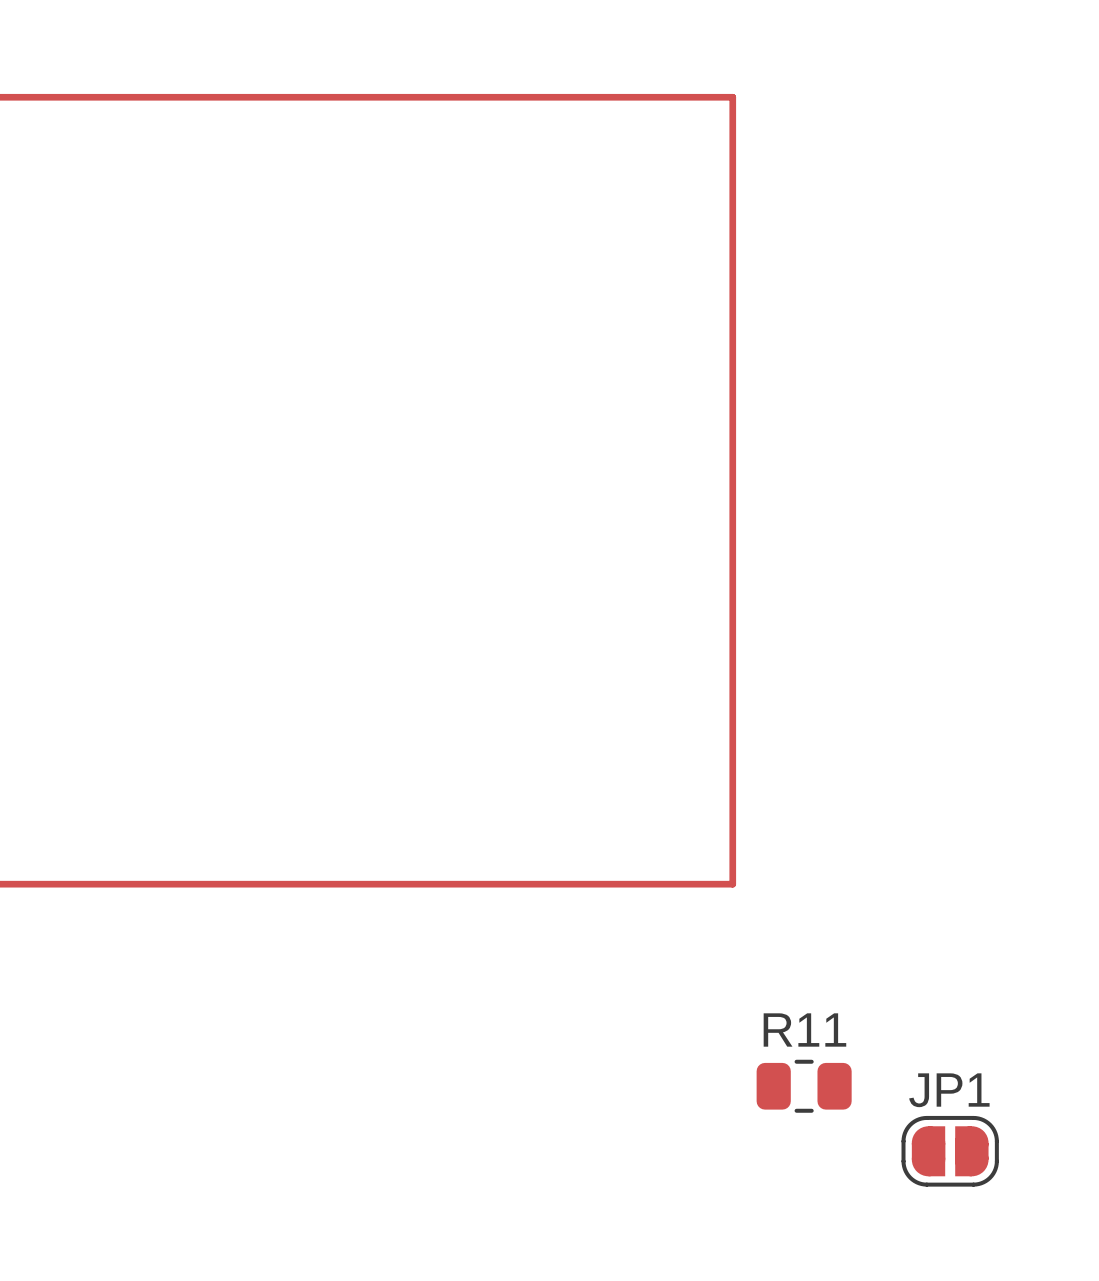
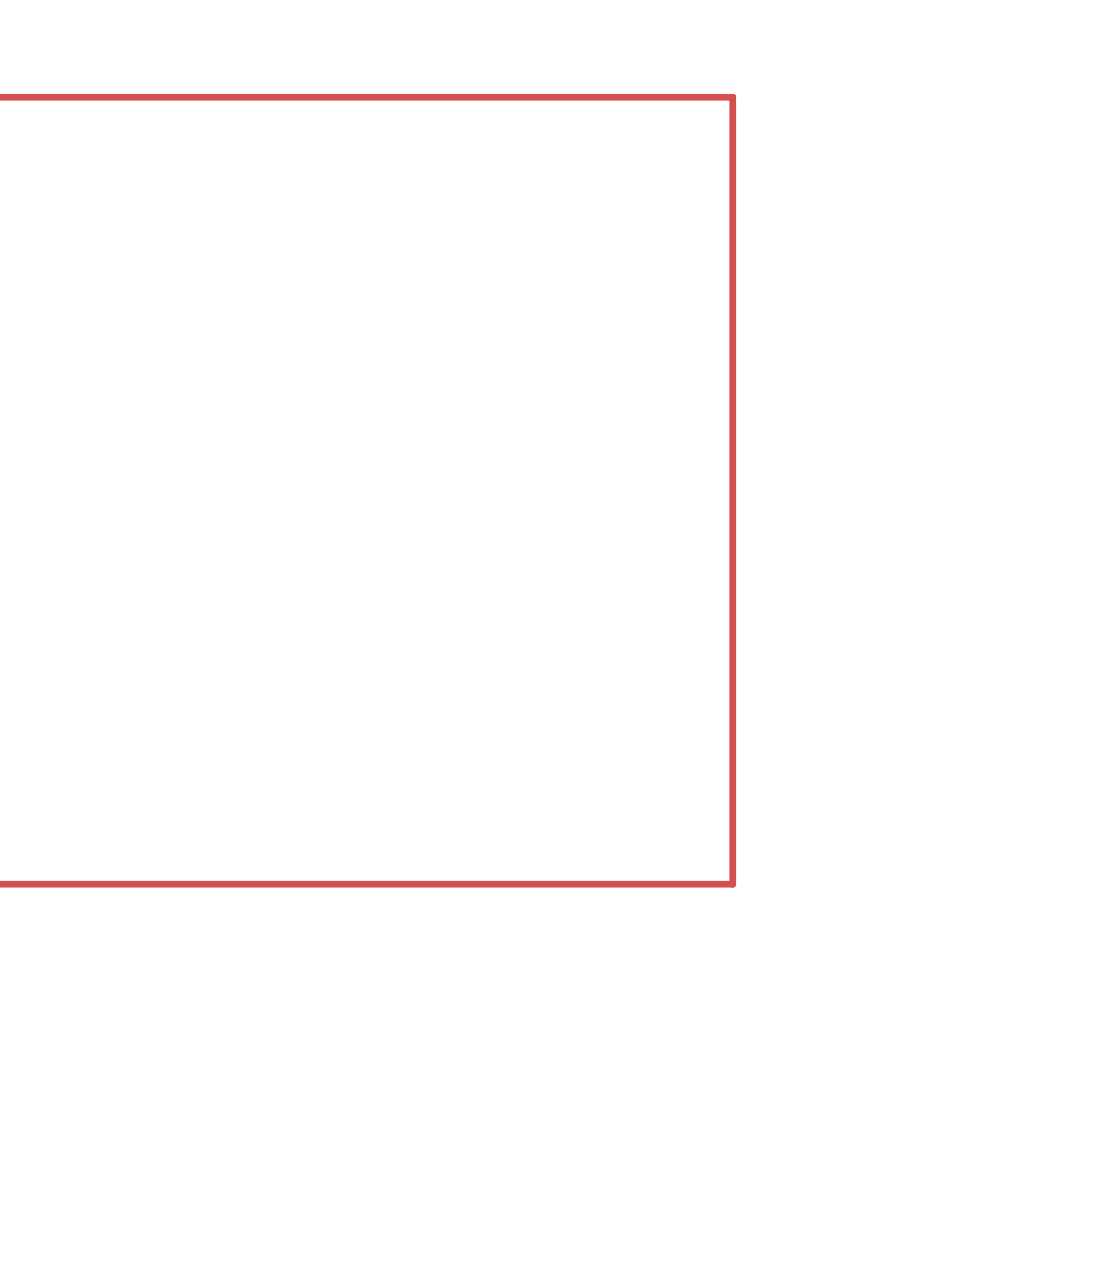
R11: (804, 1086) -> none
JP1: (950, 1151) -> none

